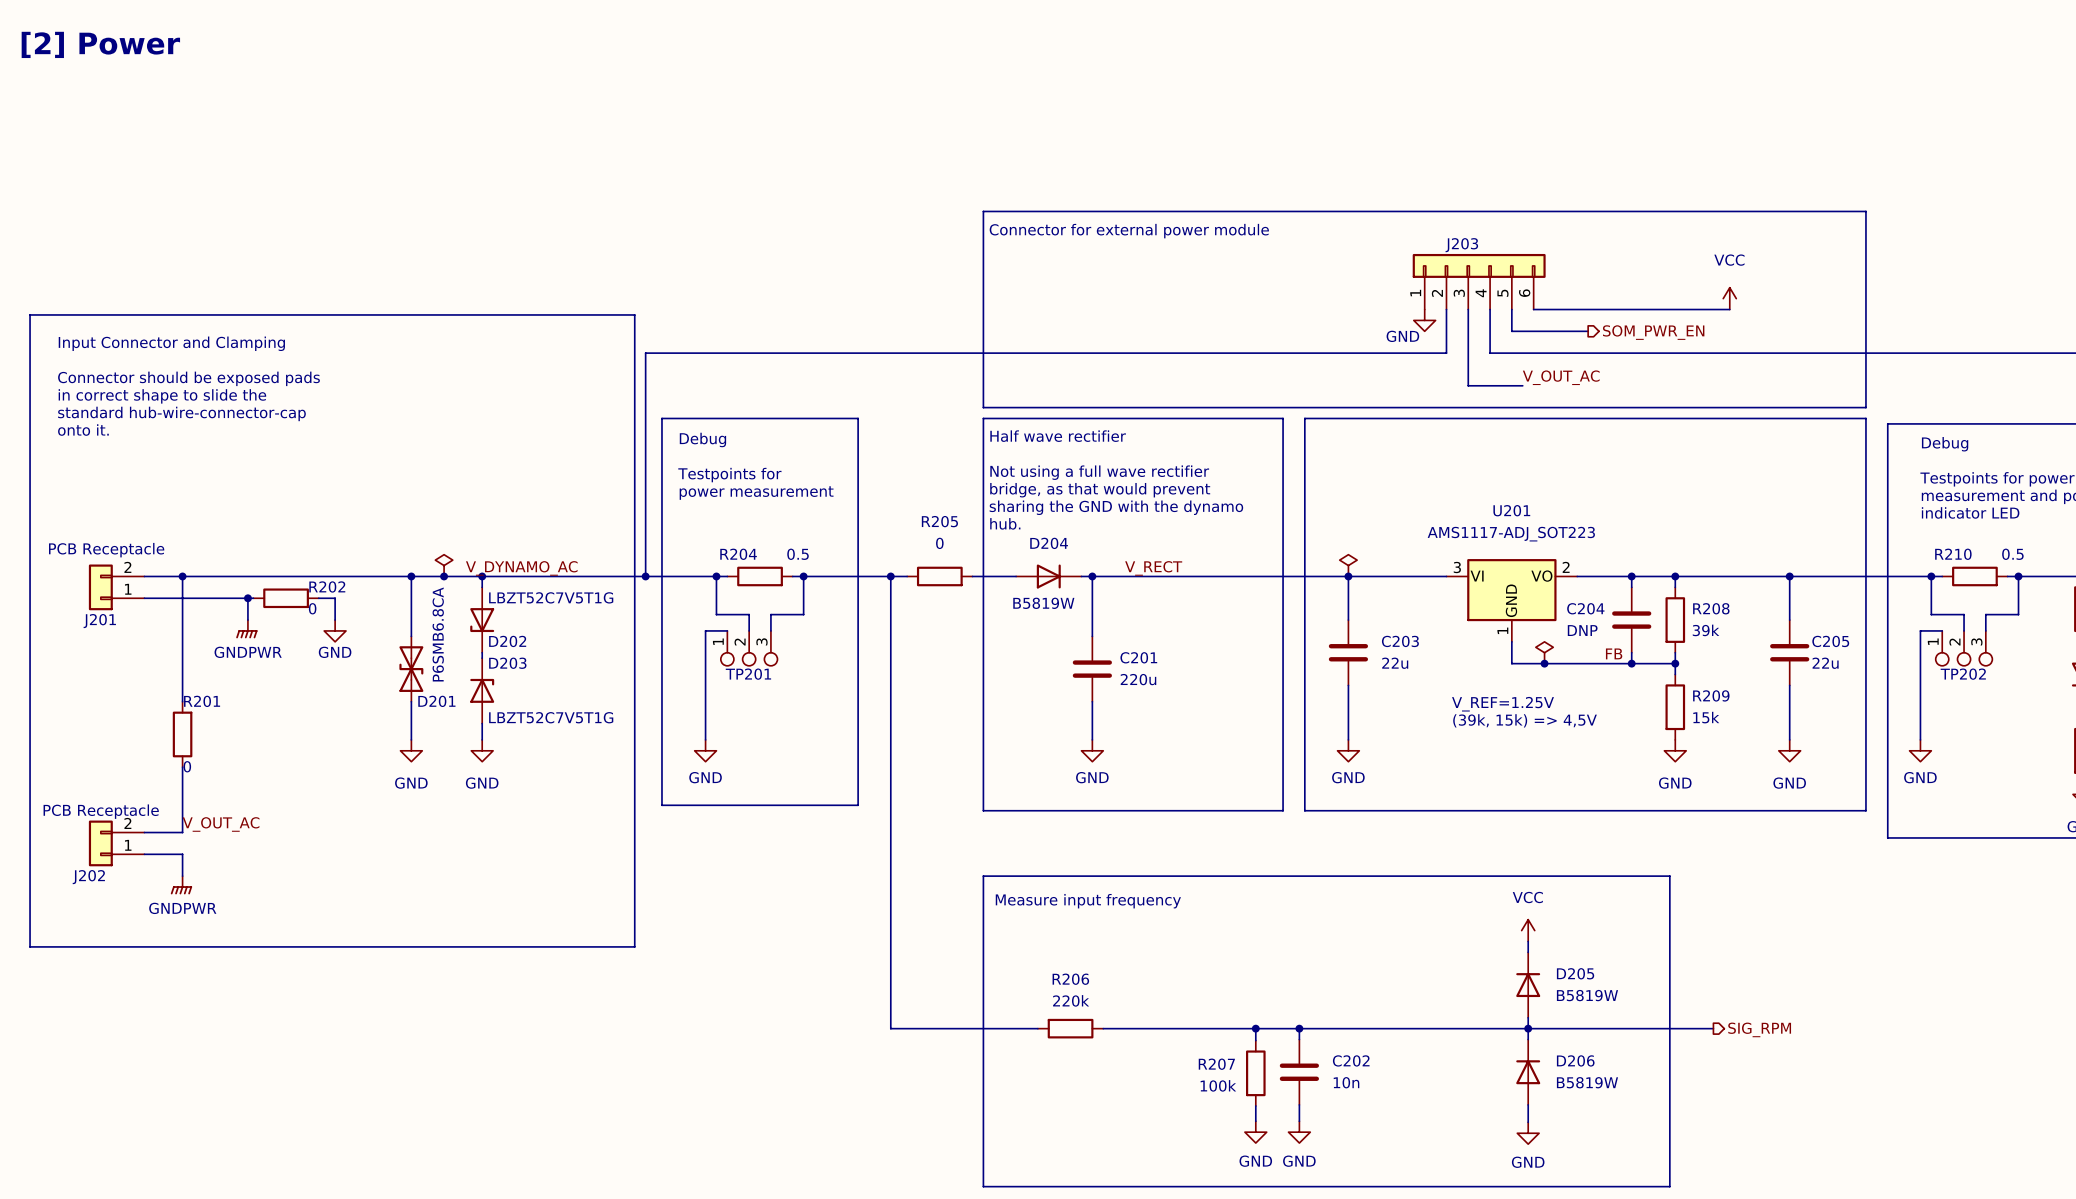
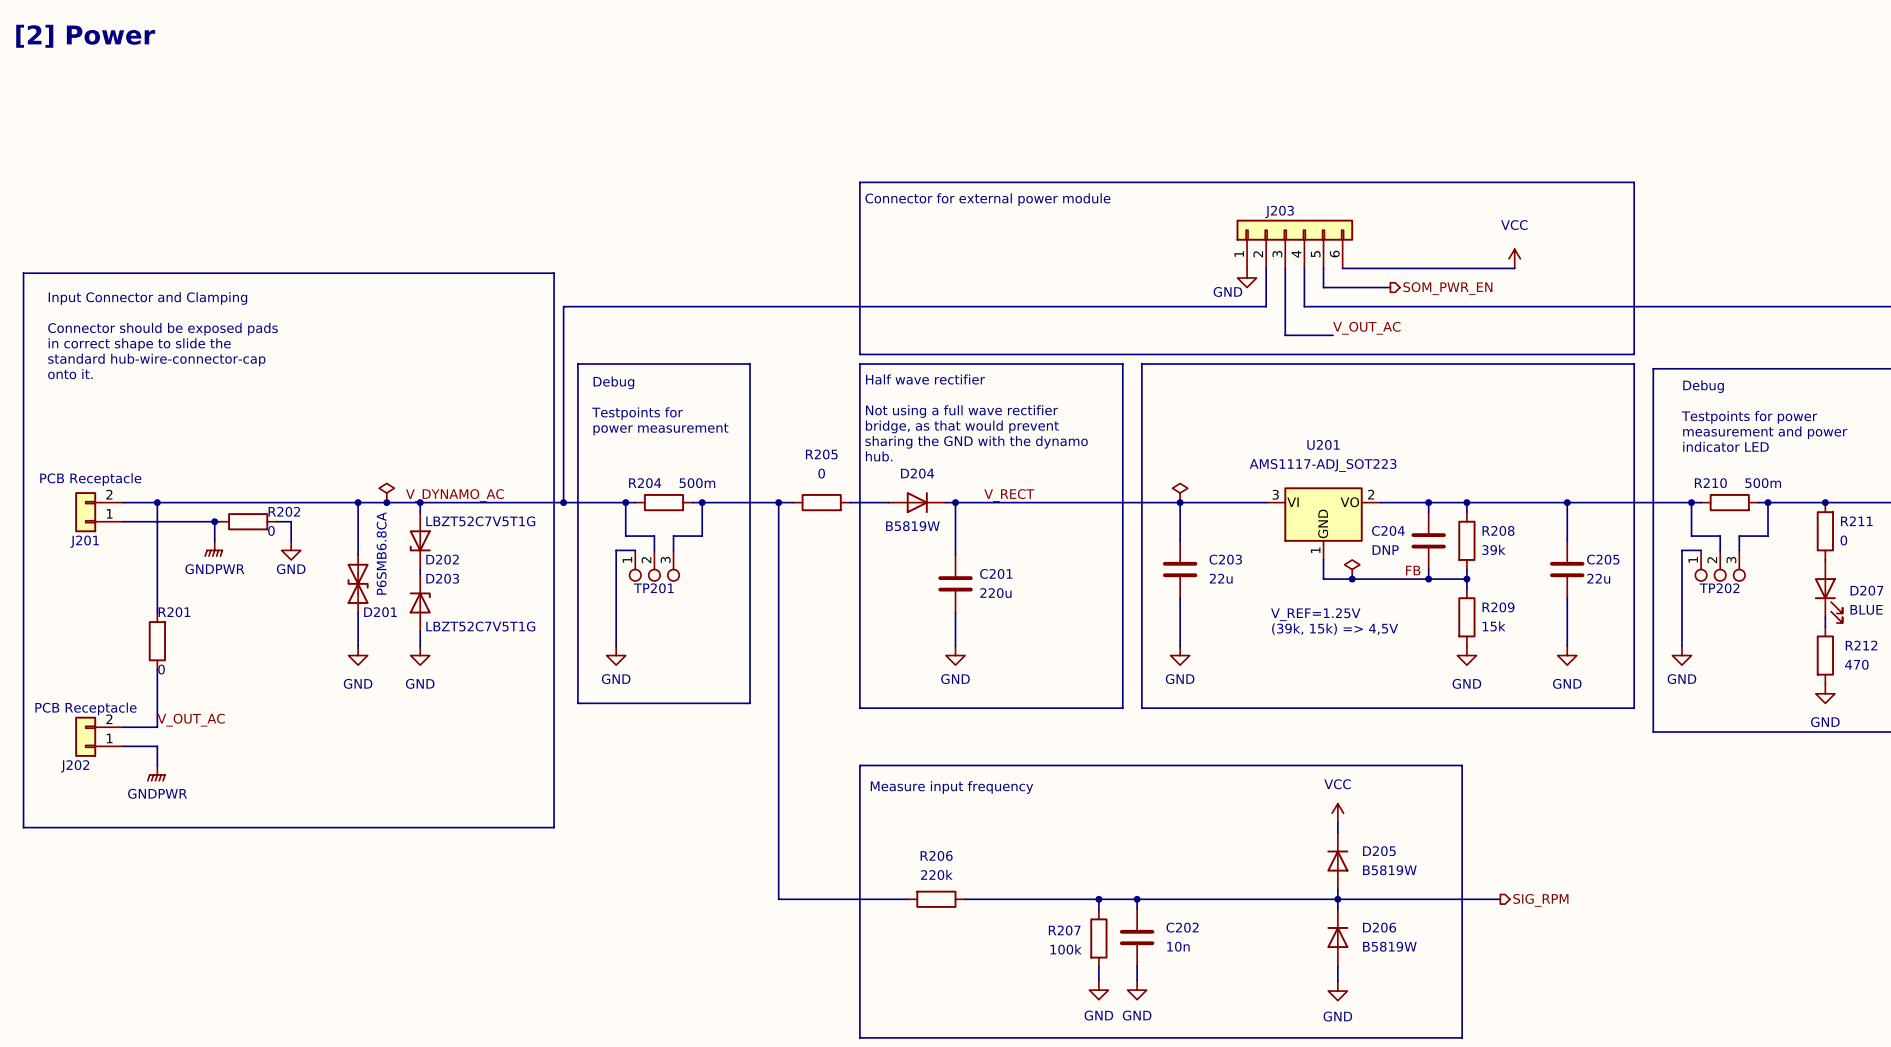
R204 value: 0.5 (798, 554) -> 500m (697, 483)
R210 value: 0.5 (2012, 554) -> 500m (1763, 483)

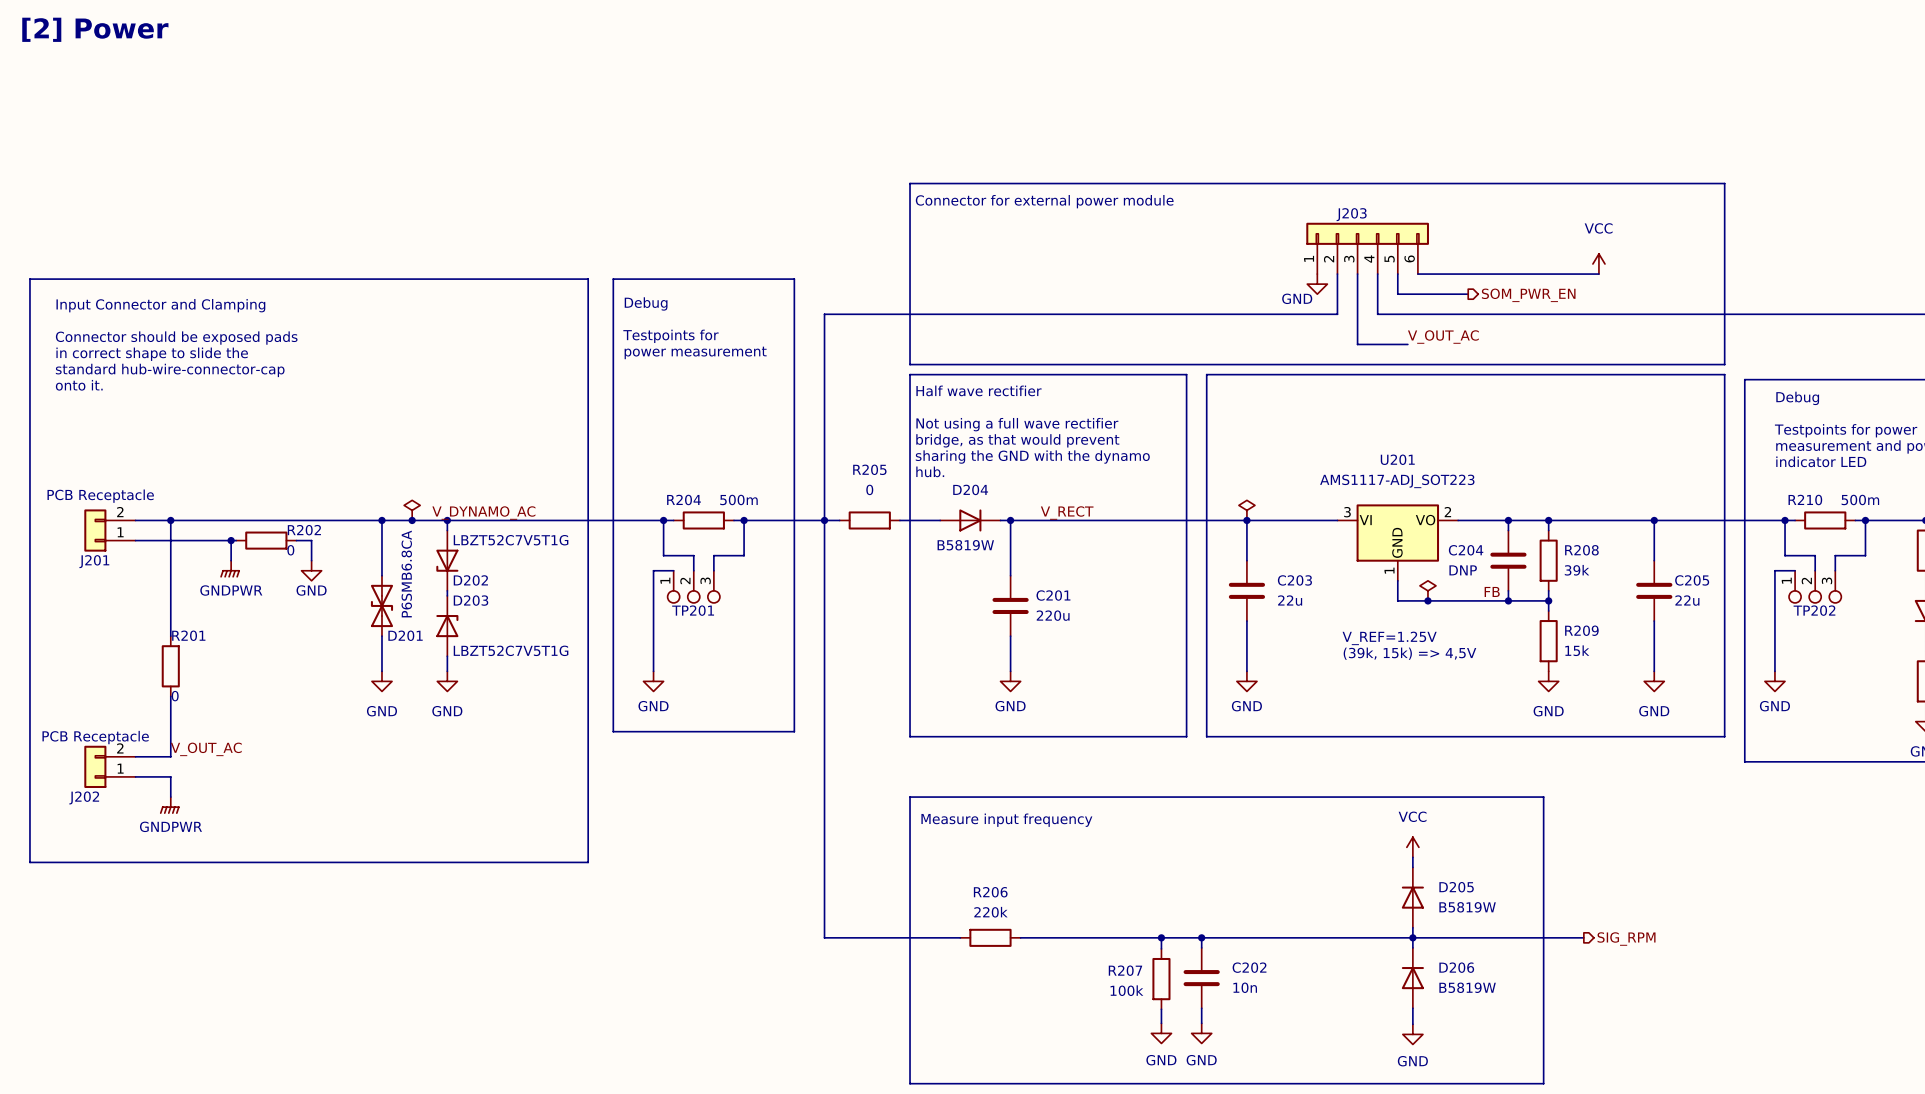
wire: (778, 306) (563, 306) (563, 502) -> (824, 314) (824, 520)
line: (577, 364) (750, 364) -> (613, 374) (613, 279) (794, 279) (794, 374)
text position: Debug (613, 382) -> Debug (646, 303)
text position: Testpoints for (637, 413) -> Testpoints for (670, 336)
text position: power measurement (660, 429) -> power measurement (695, 352)
junction: (563, 502) -> none

